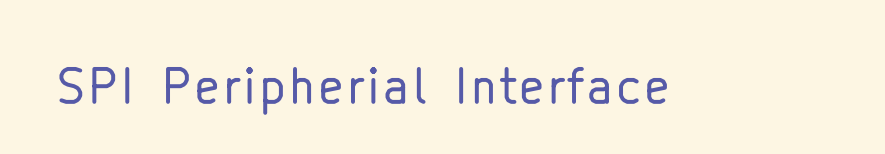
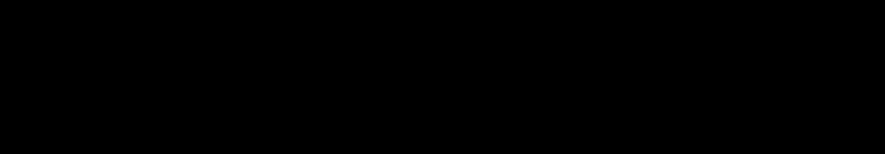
text: SPI Peripherial Interface (363, 90) -> none

